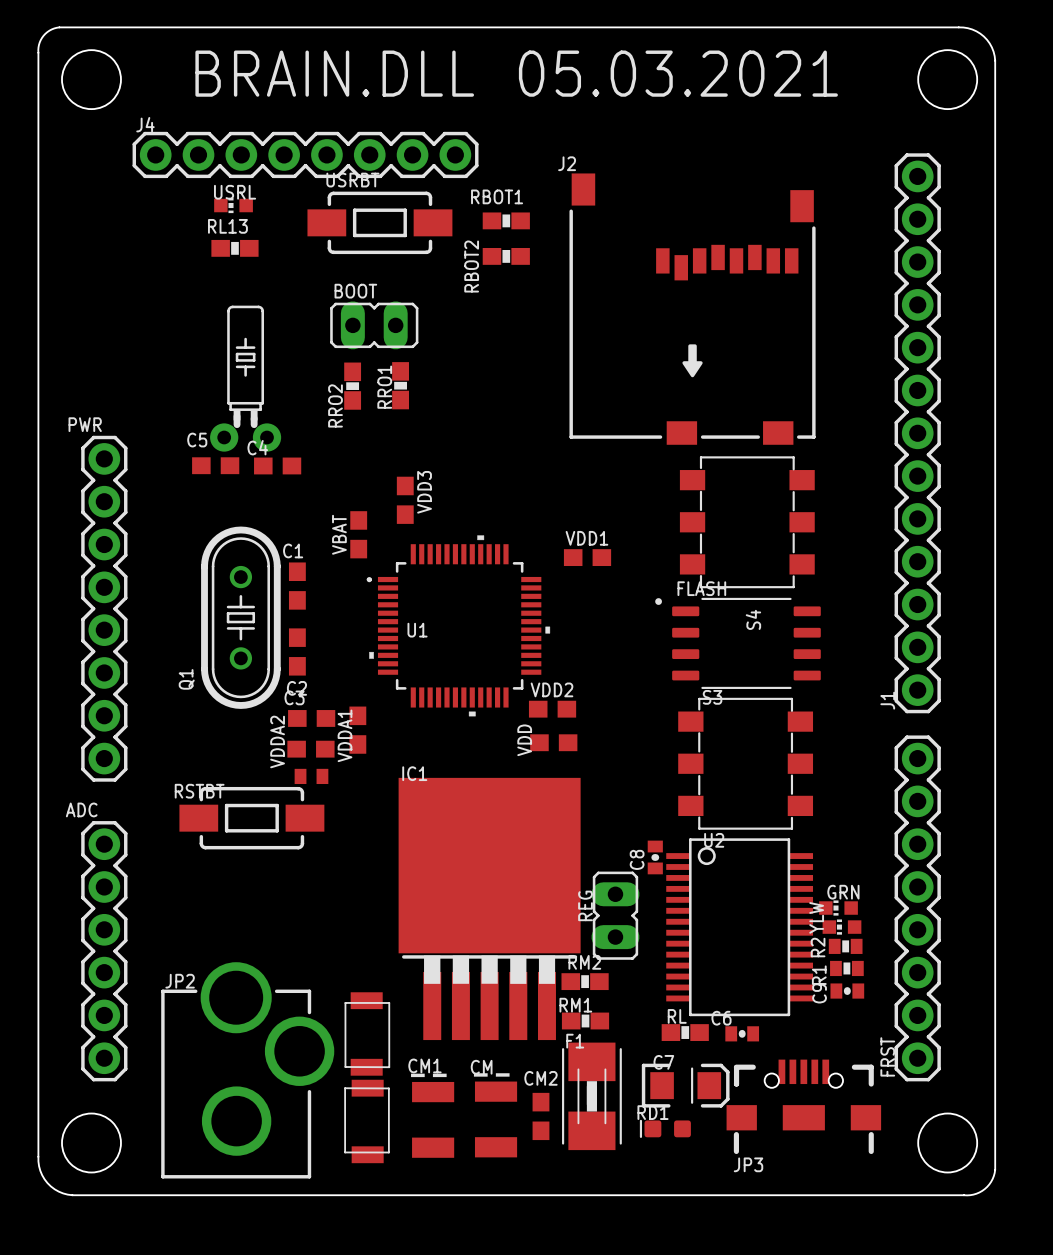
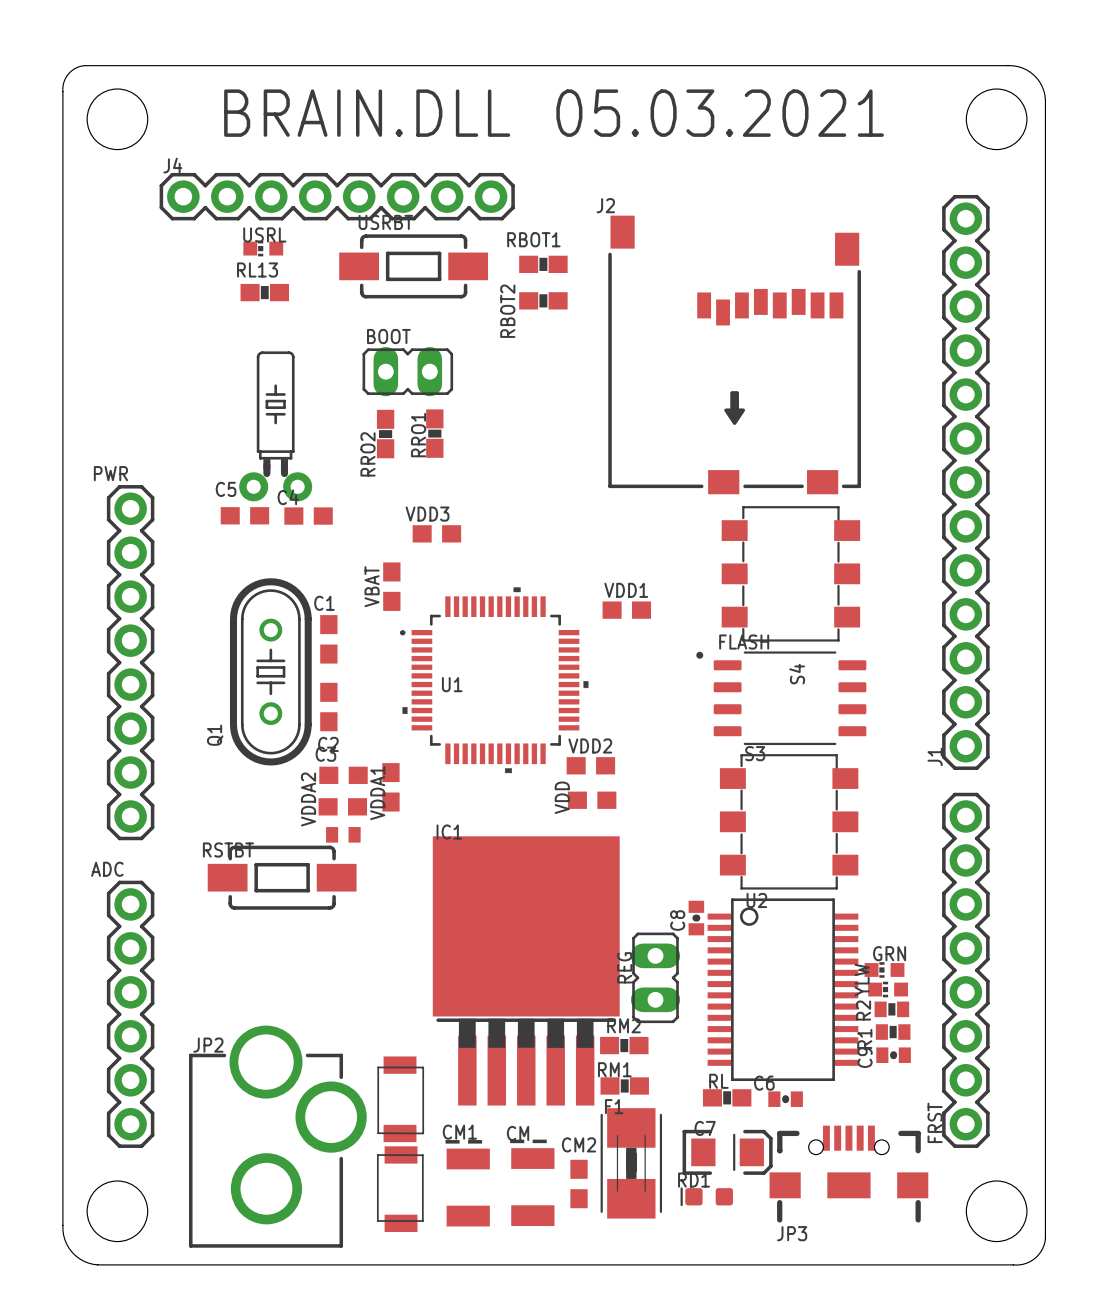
VDD3 rotation: 0° (405, 500) -> 90° clockwise (436, 533)

